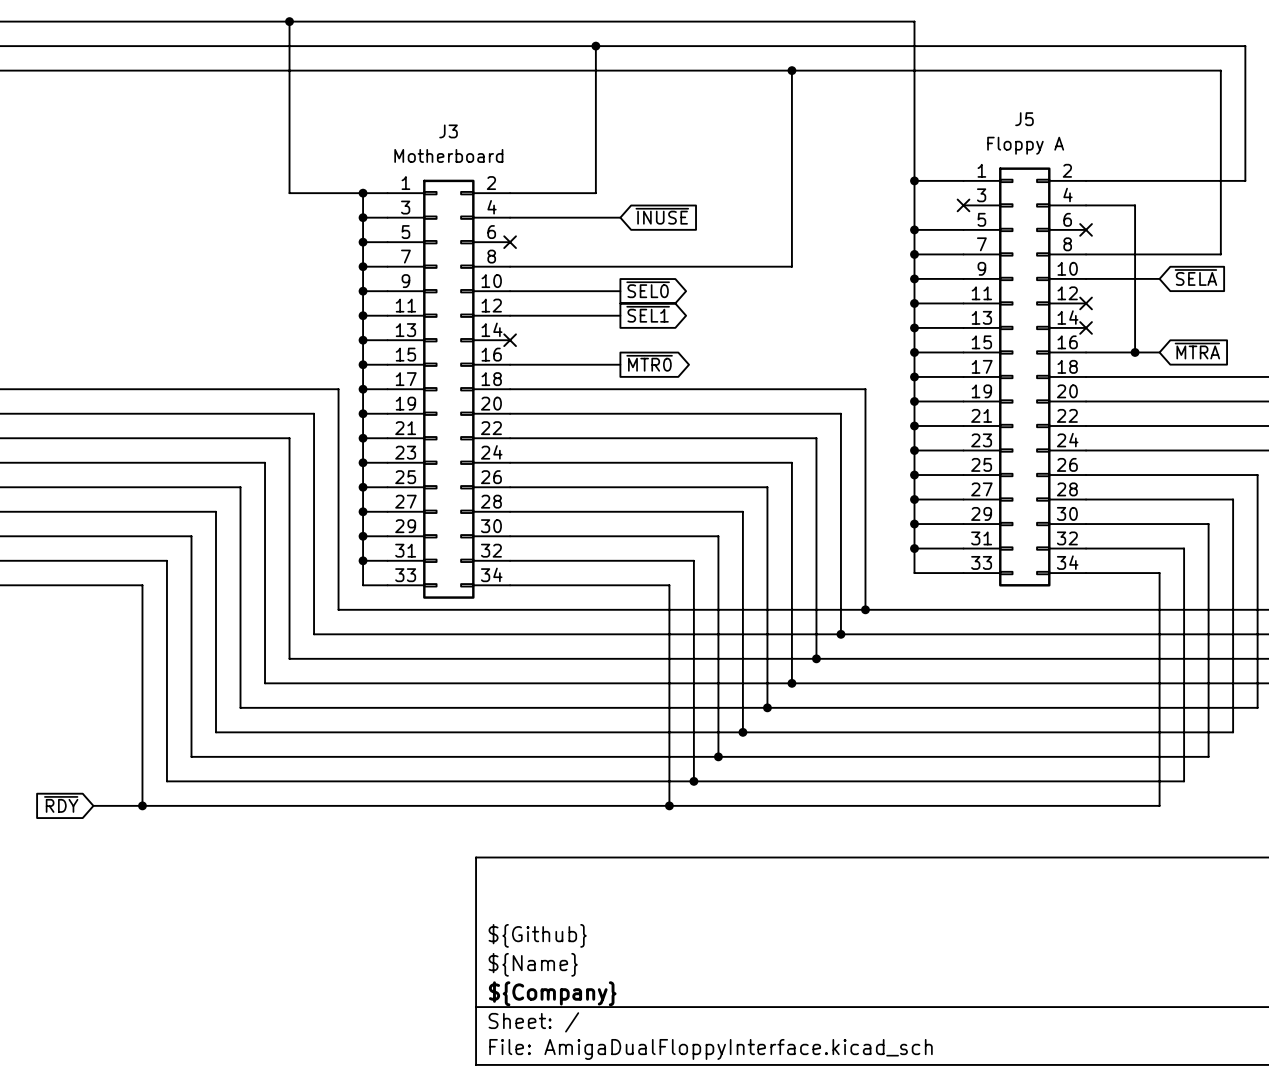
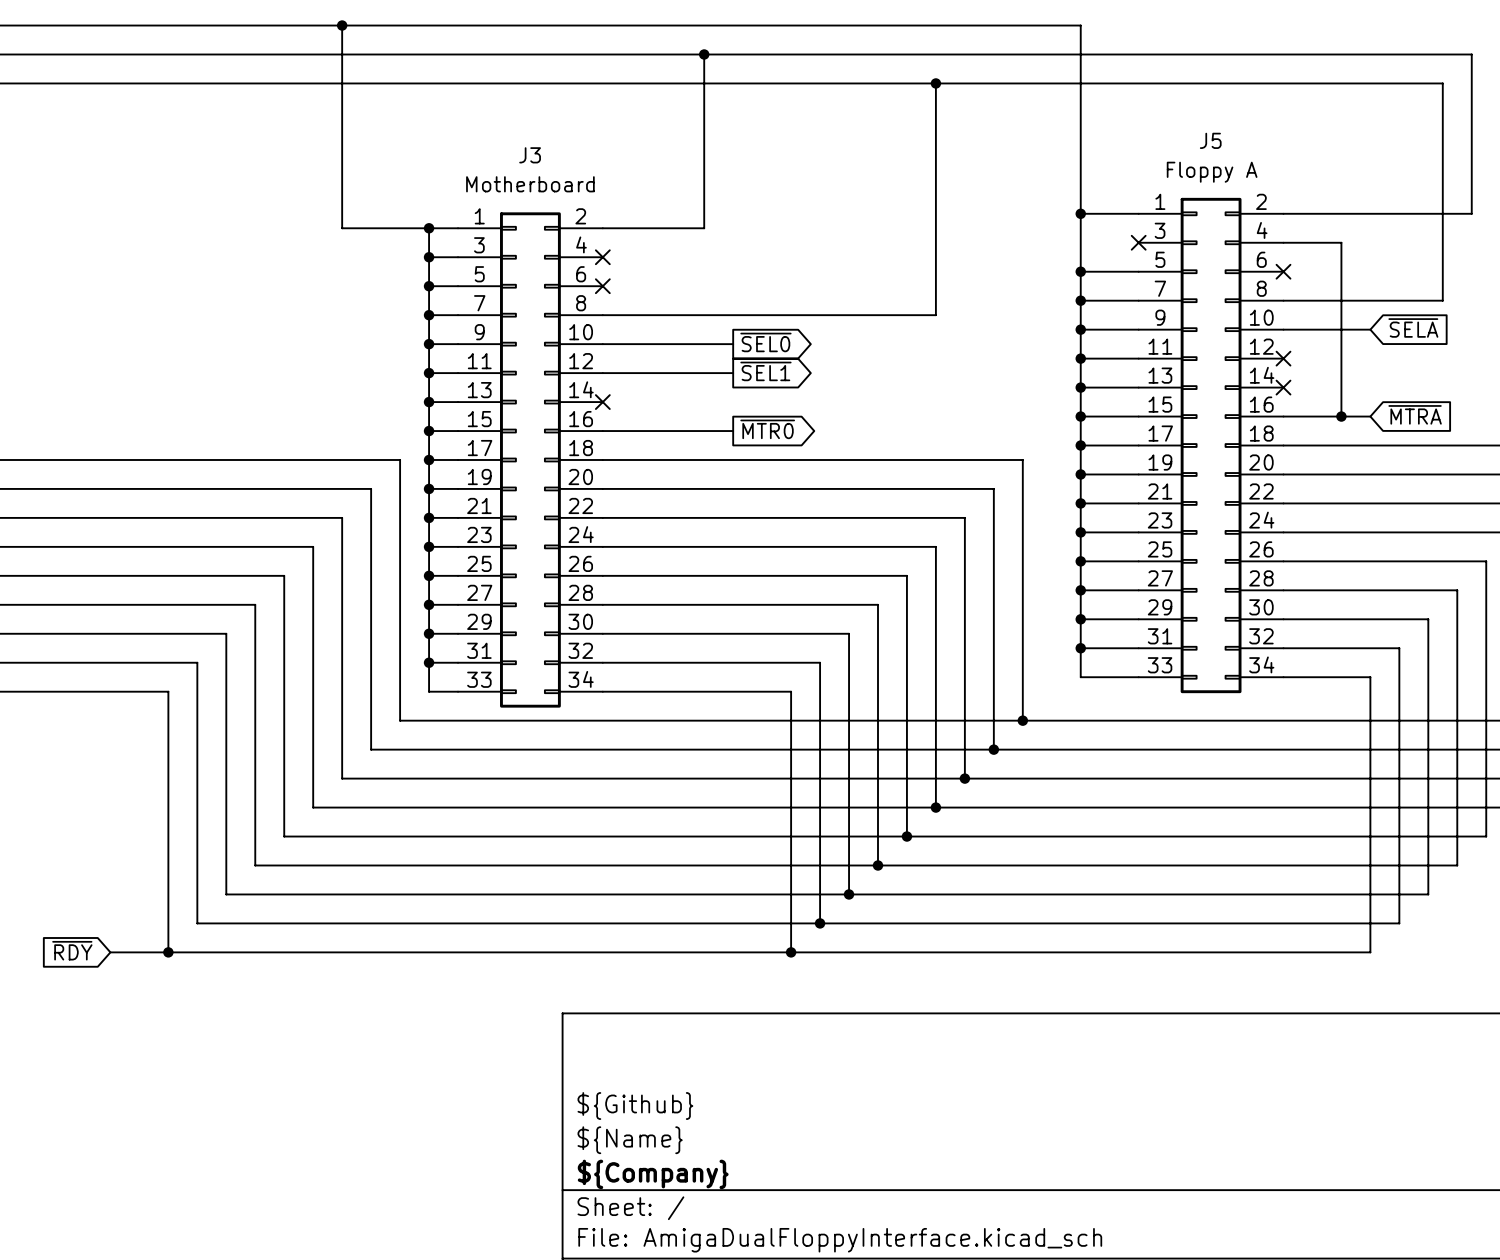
global label: ~{INUSE} (662, 216) -> none
wire: (510, 217) (620, 217) -> none
no-connect mark: none -> (602, 257)

